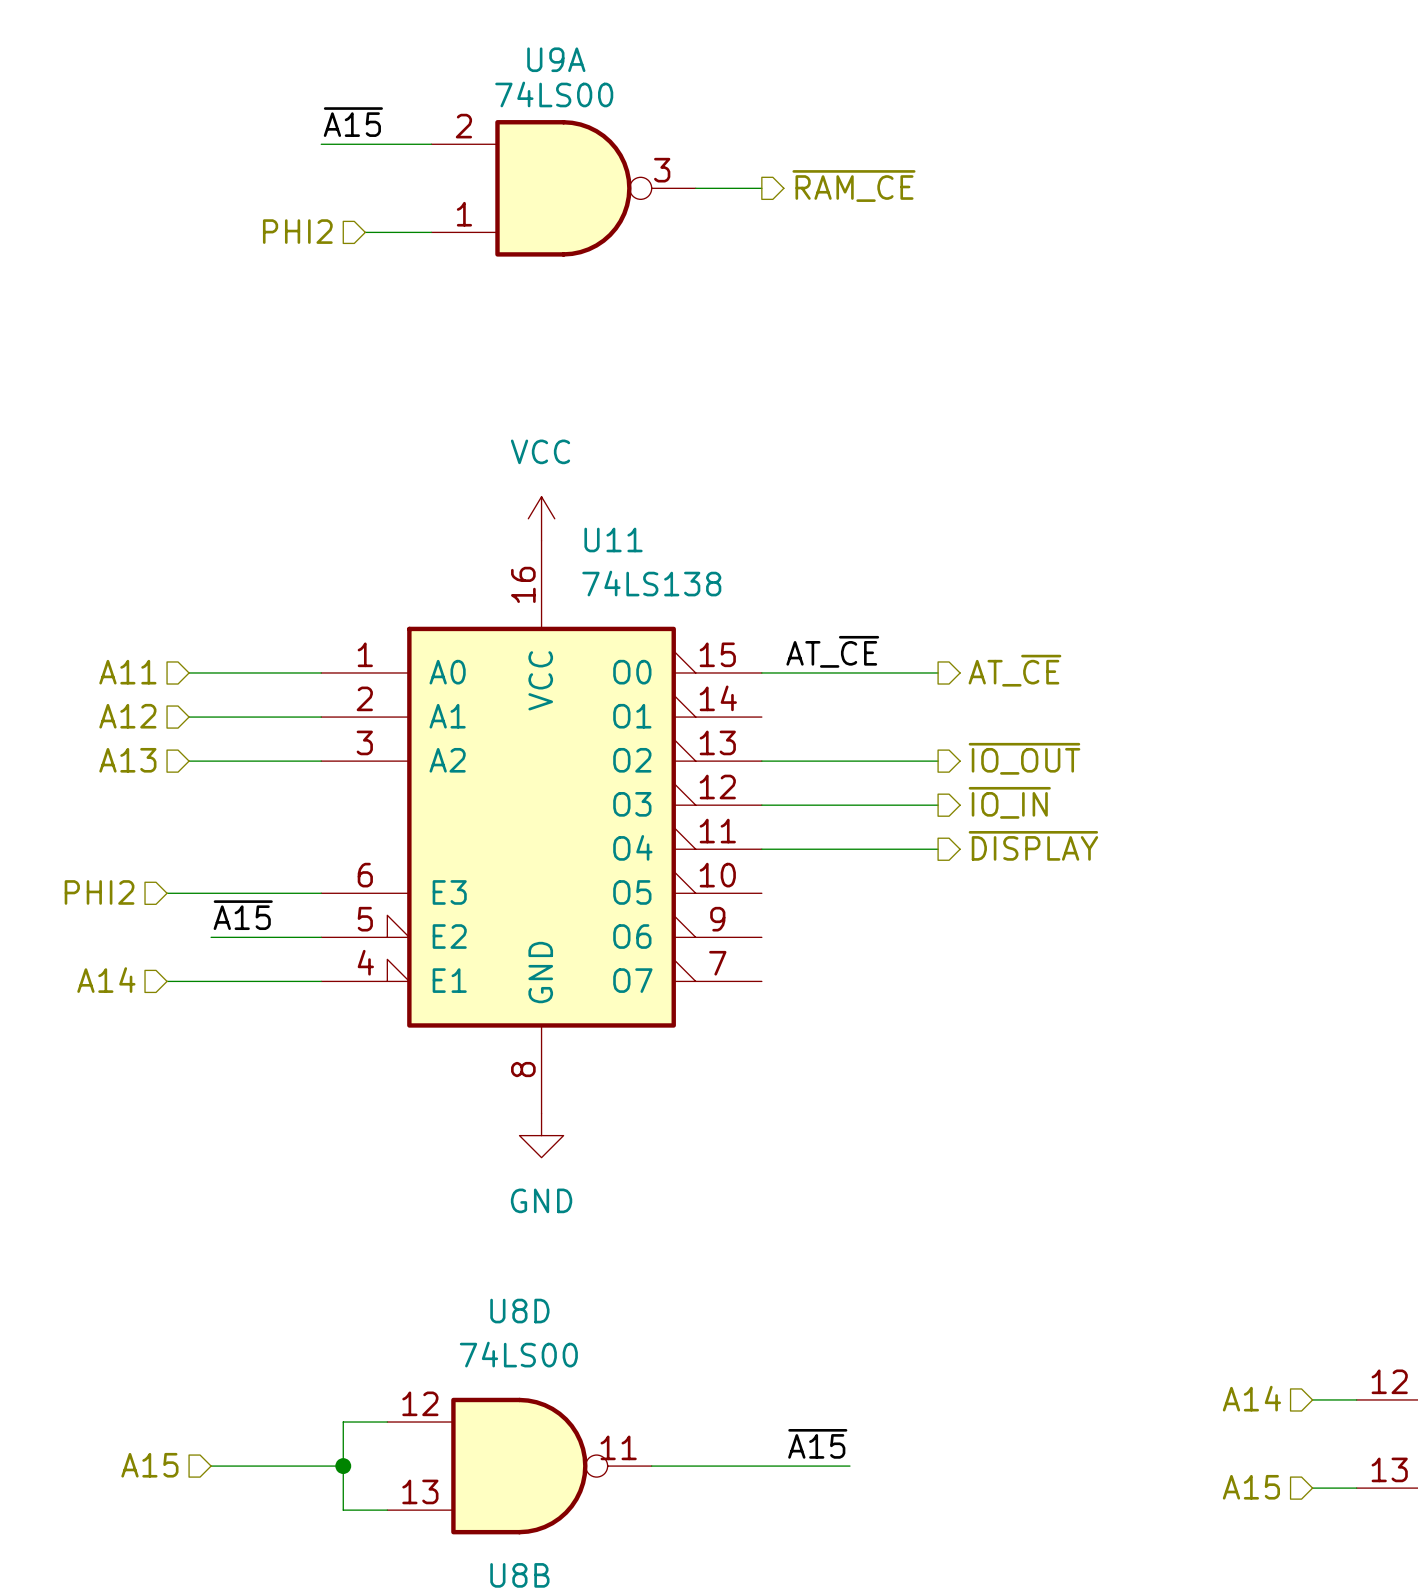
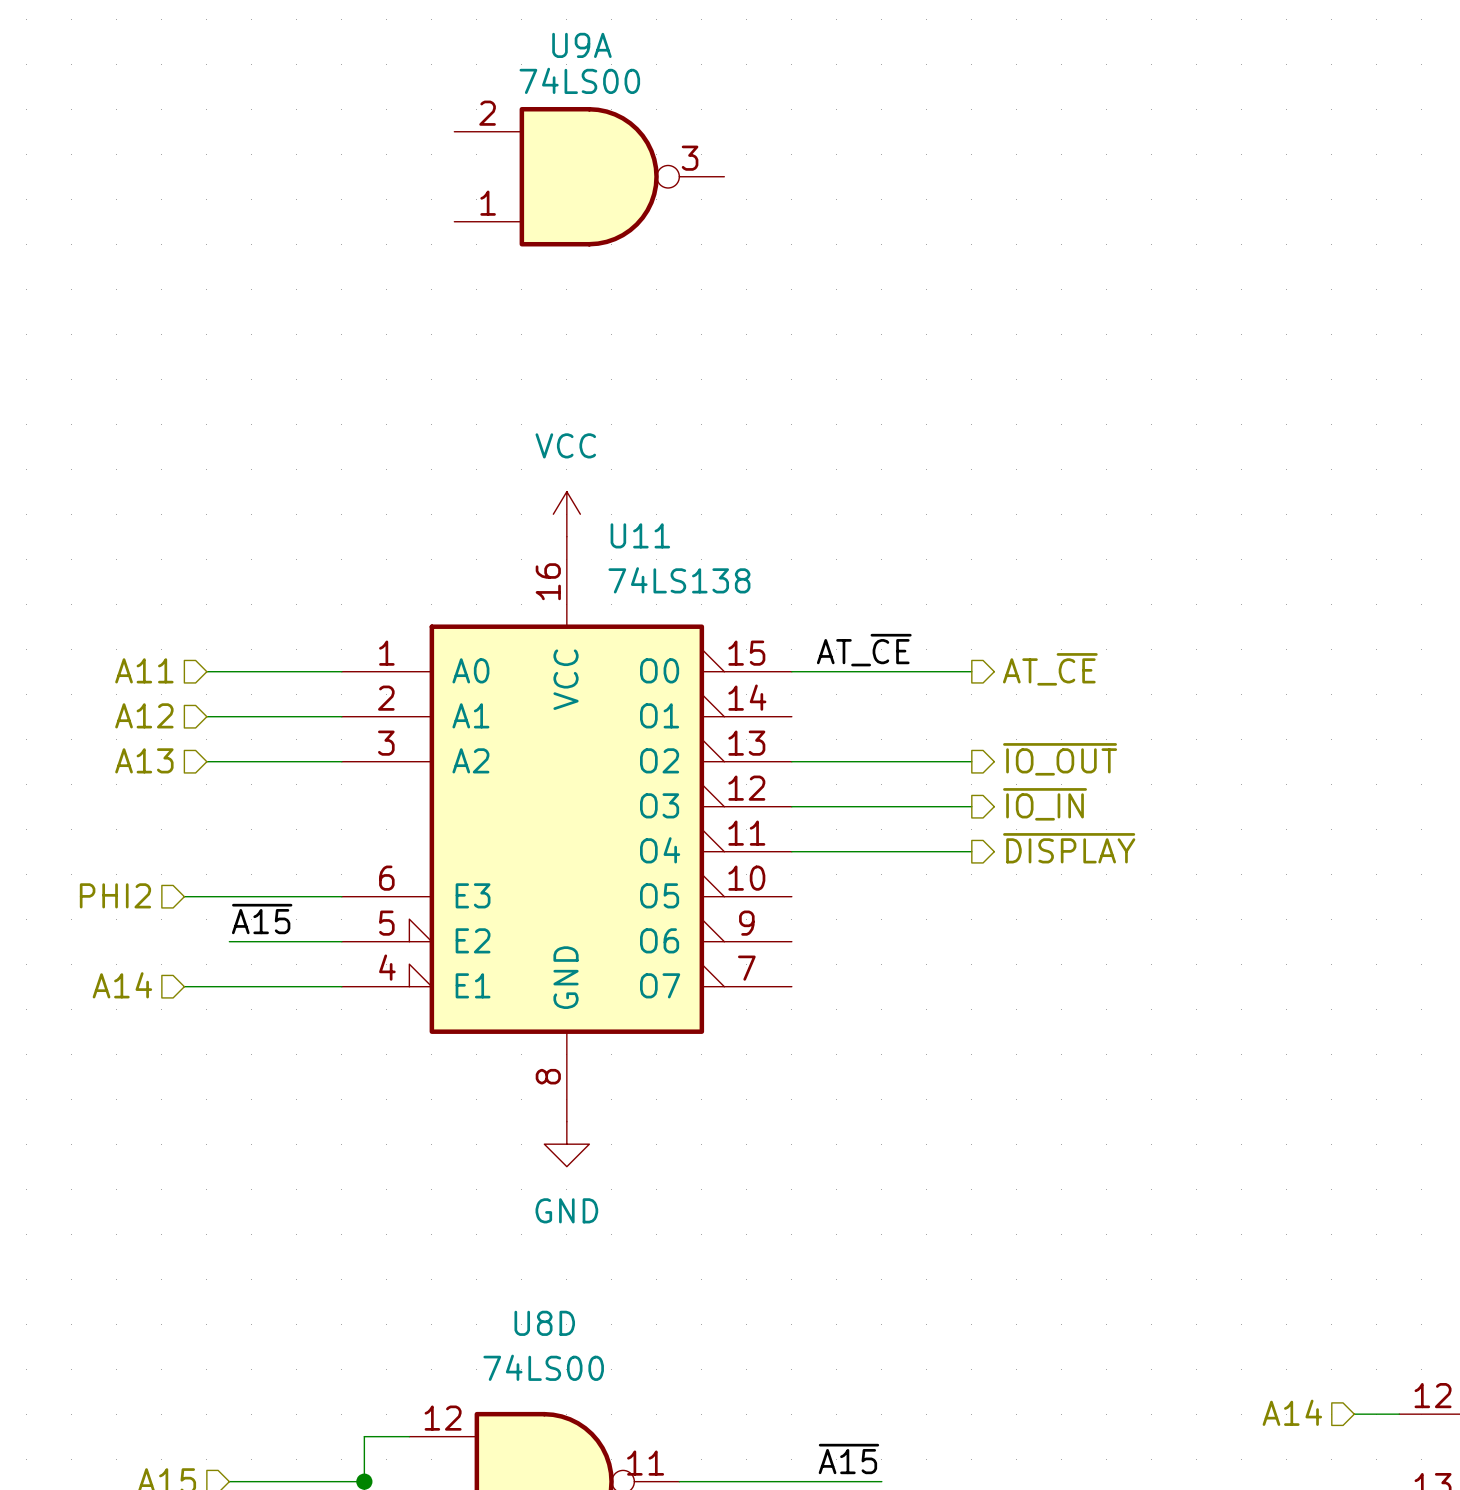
label: ~{A15} (353, 122) -> none
wire: (321, 144) (431, 144) -> none
hierarchical label: ~{RAM_CE} (853, 186) -> none
wire: (695, 188) (761, 188) -> none
hierarchical label: PHI2 (297, 231) -> none
wire: (365, 232) (431, 232) -> none

